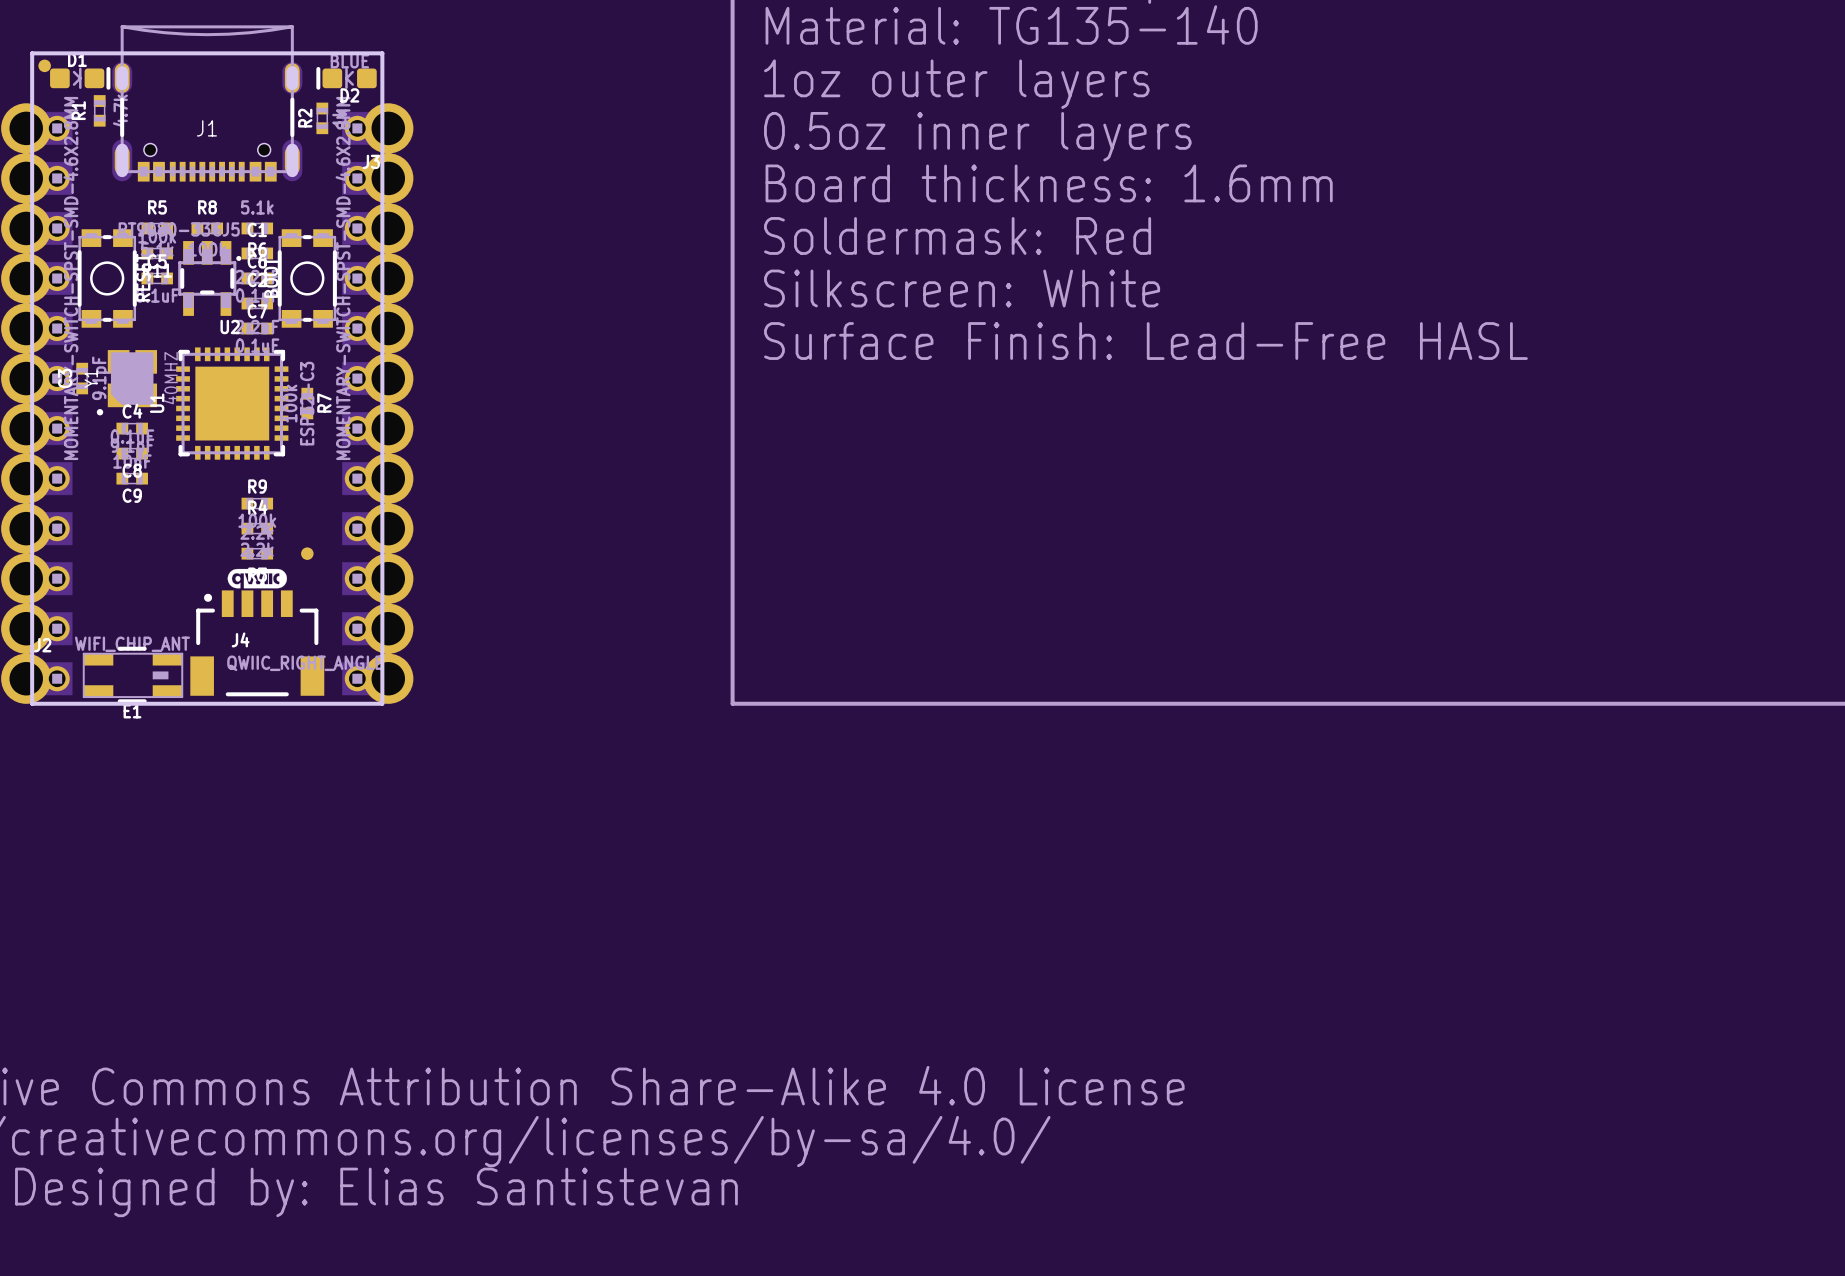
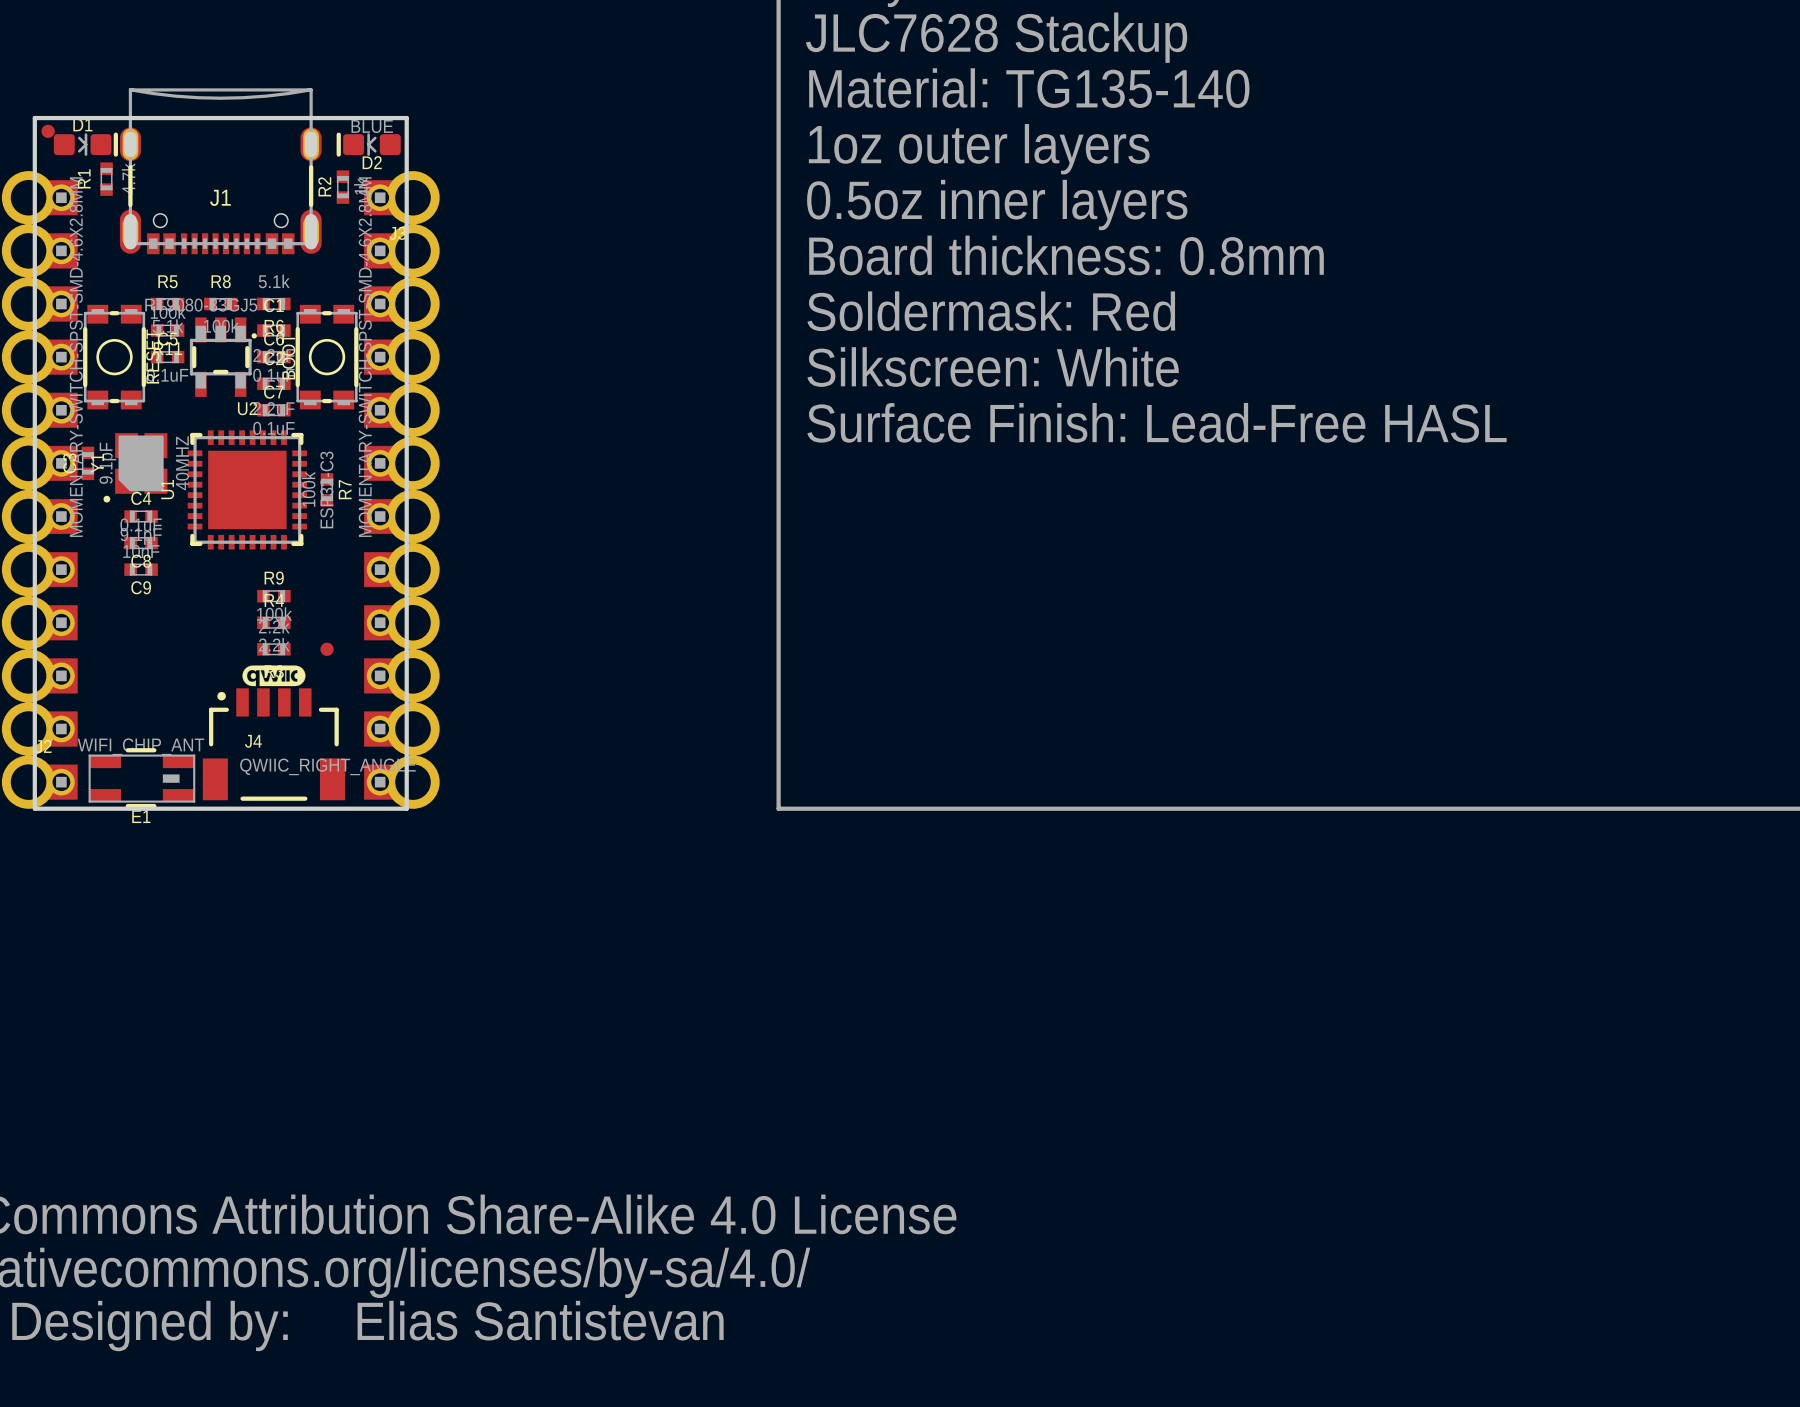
text: Board thickness: 1.6mm (1049, 183) -> Board thickness: 0.8mm (1066, 255)

